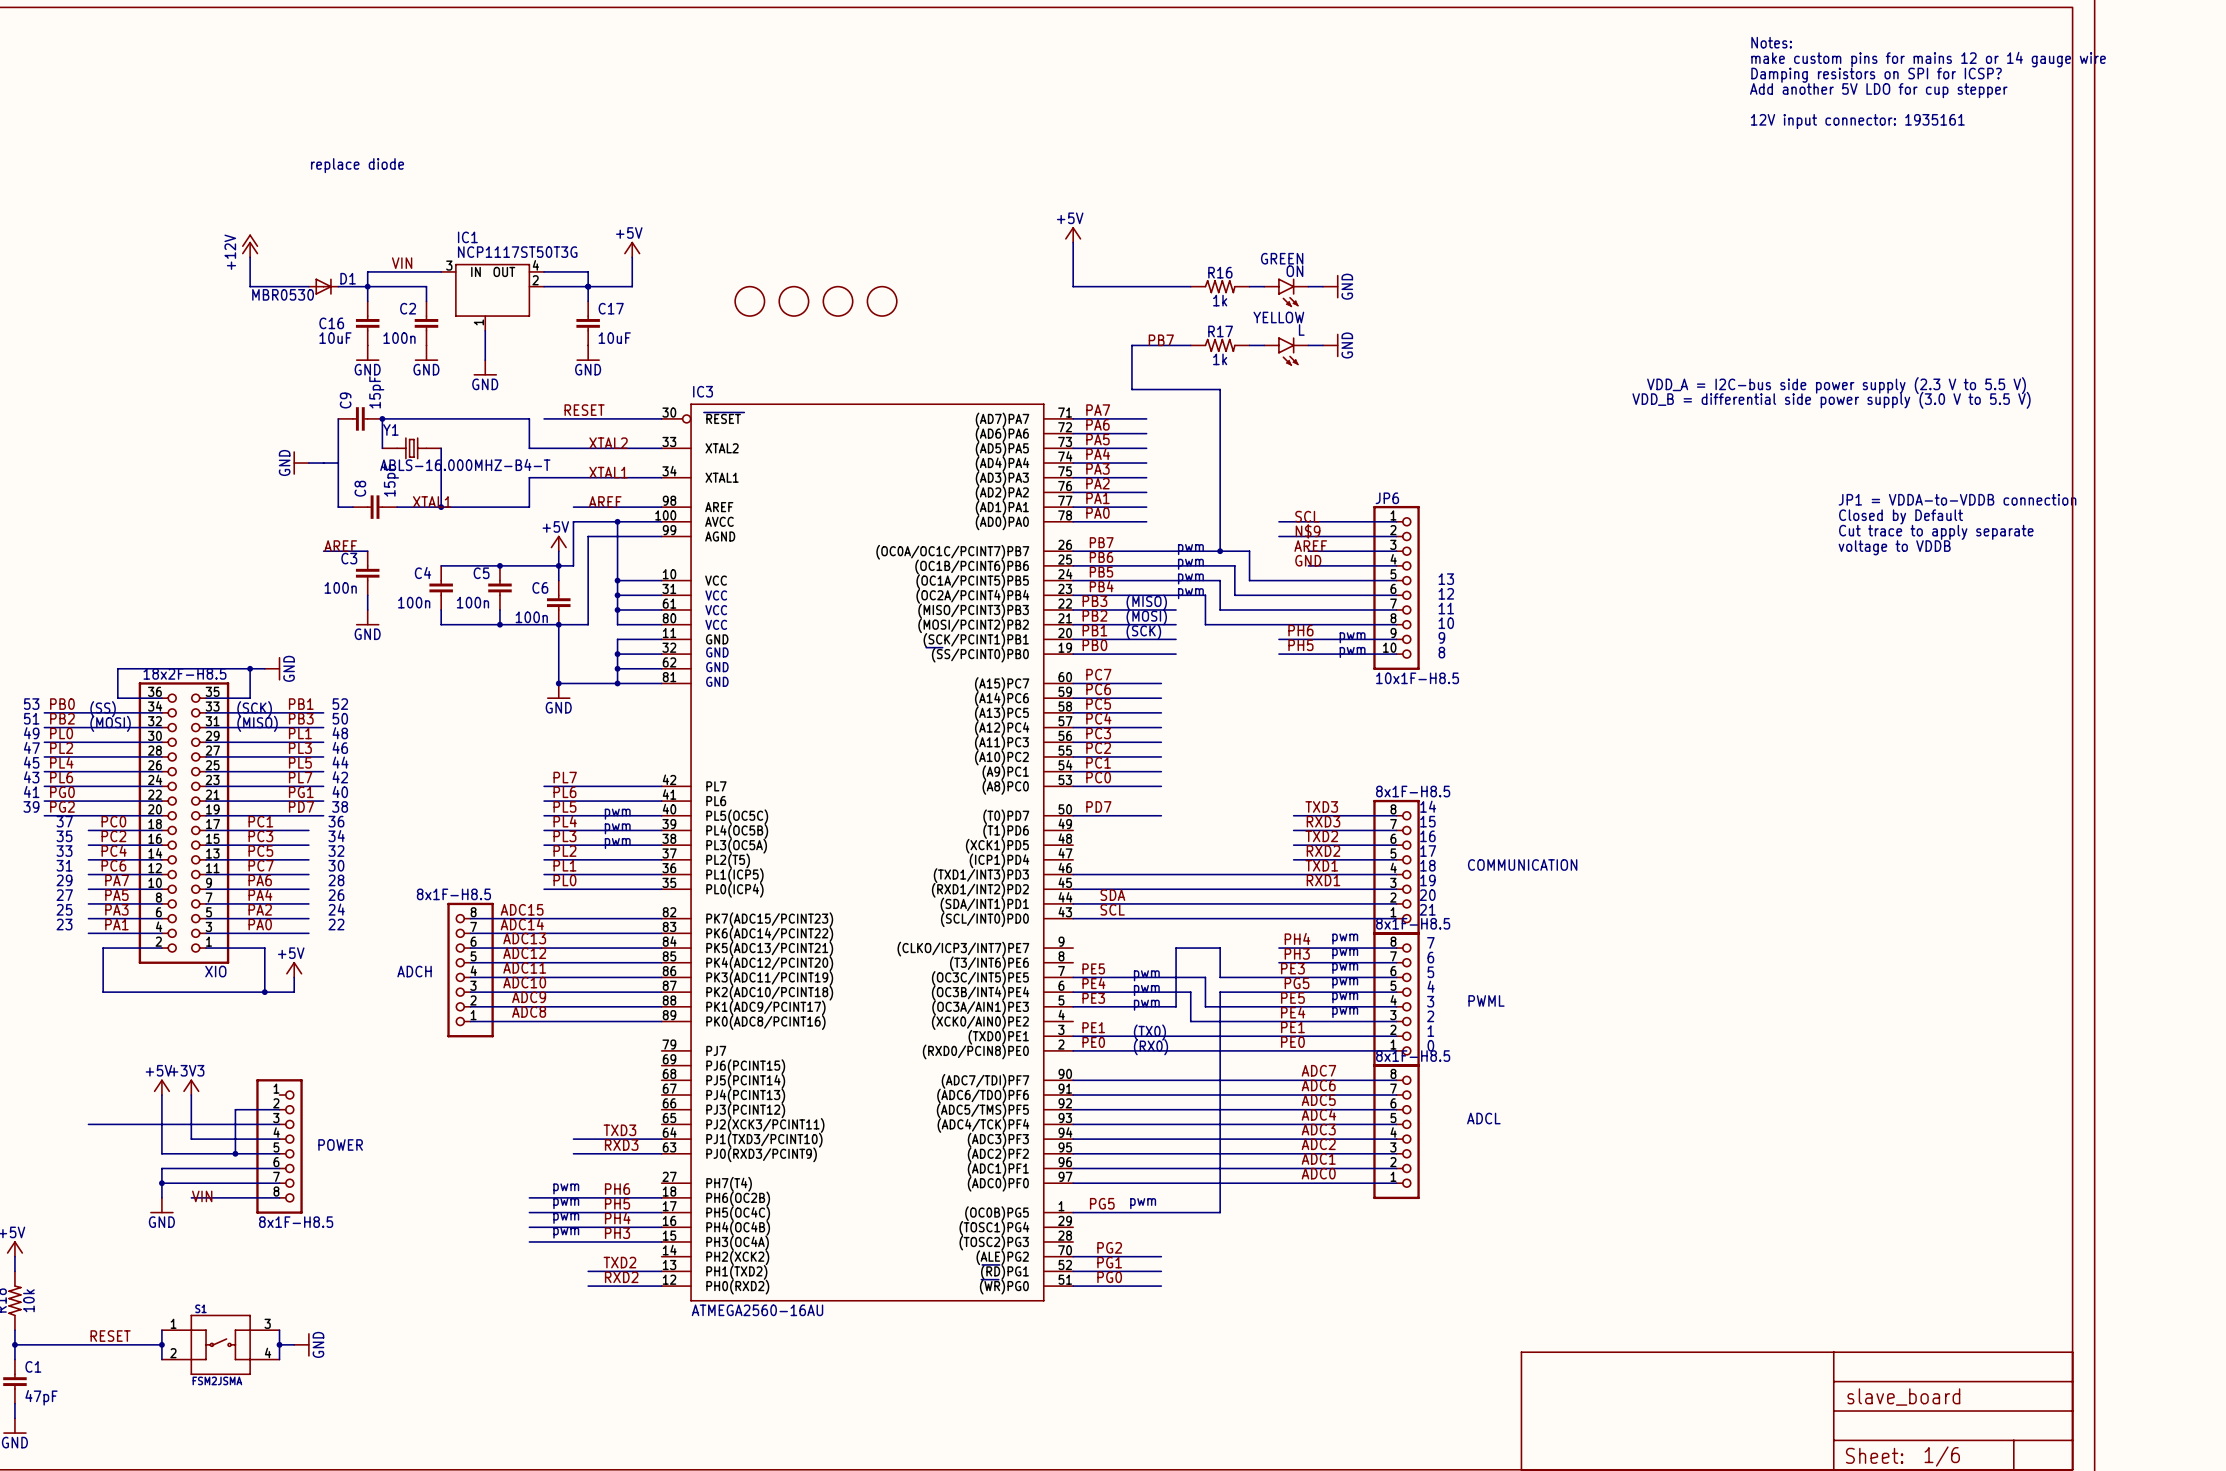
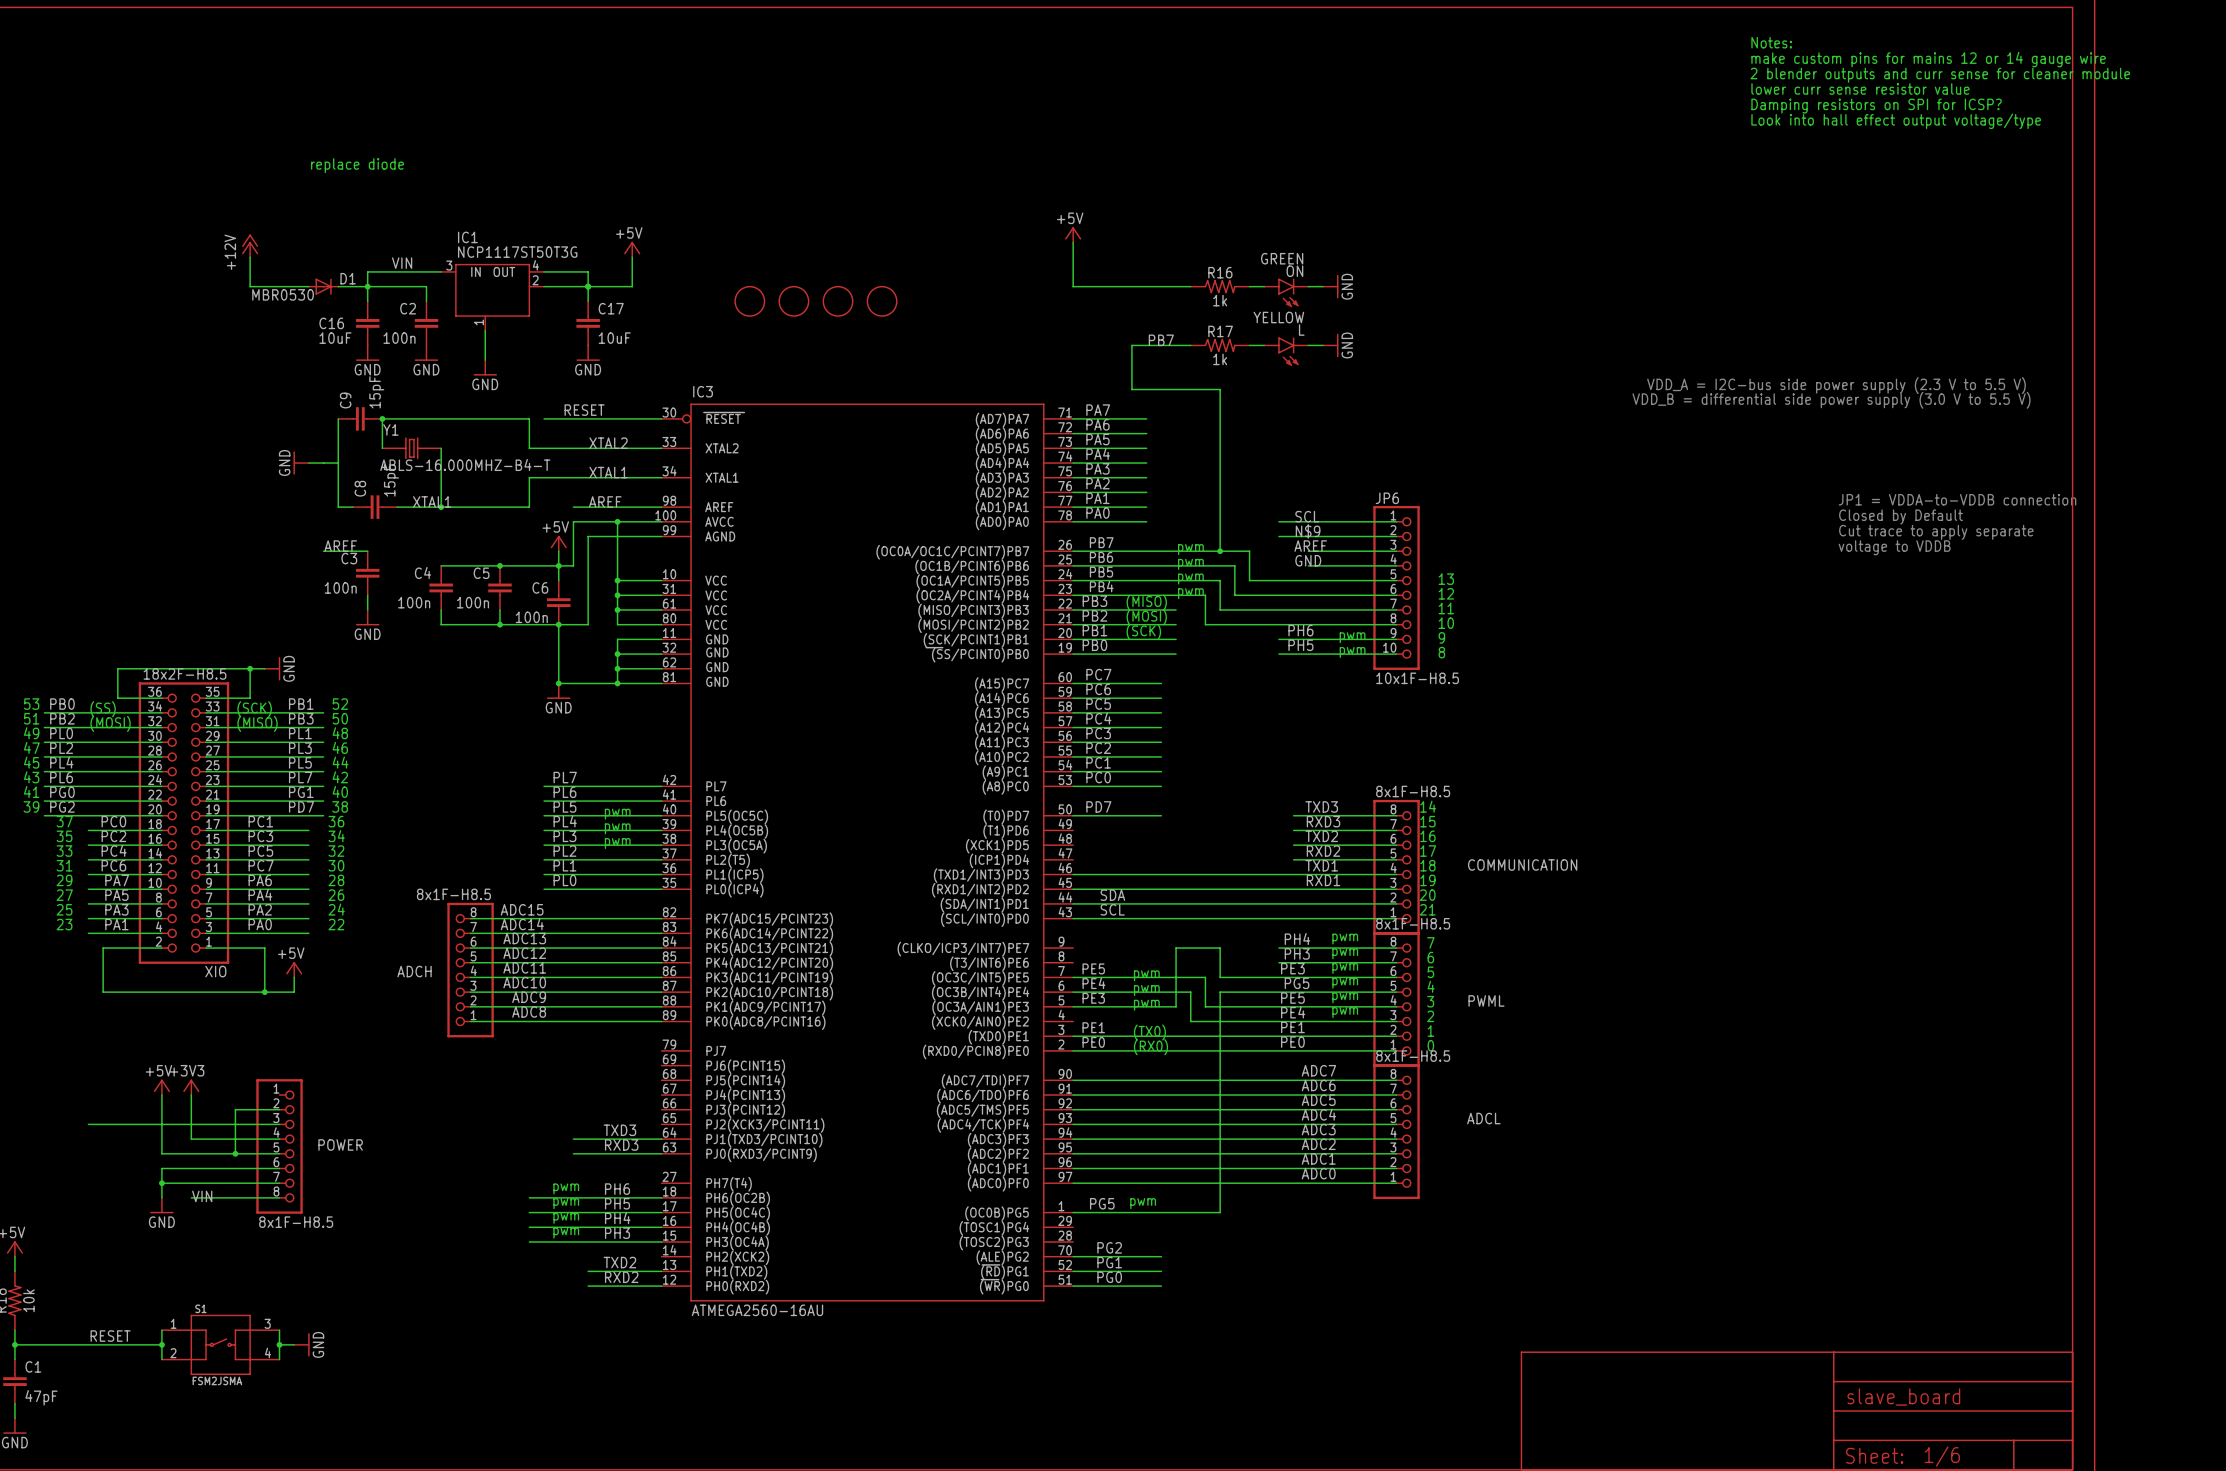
text: Damping resistors on SPI for ICSP? (1876, 75) -> 2 blender outputs and curr sense for cleaner module (1940, 75)
text: Add another 5V LDO for cup stepper (1878, 90) -> lower curr sense resistor value (1860, 88)
text: none -> Damping resistors on SPI for ICSP? (1876, 106)
text: 12V input connector: 1935161 (1857, 121) -> Look into hall effect output voltage/type (1896, 121)

